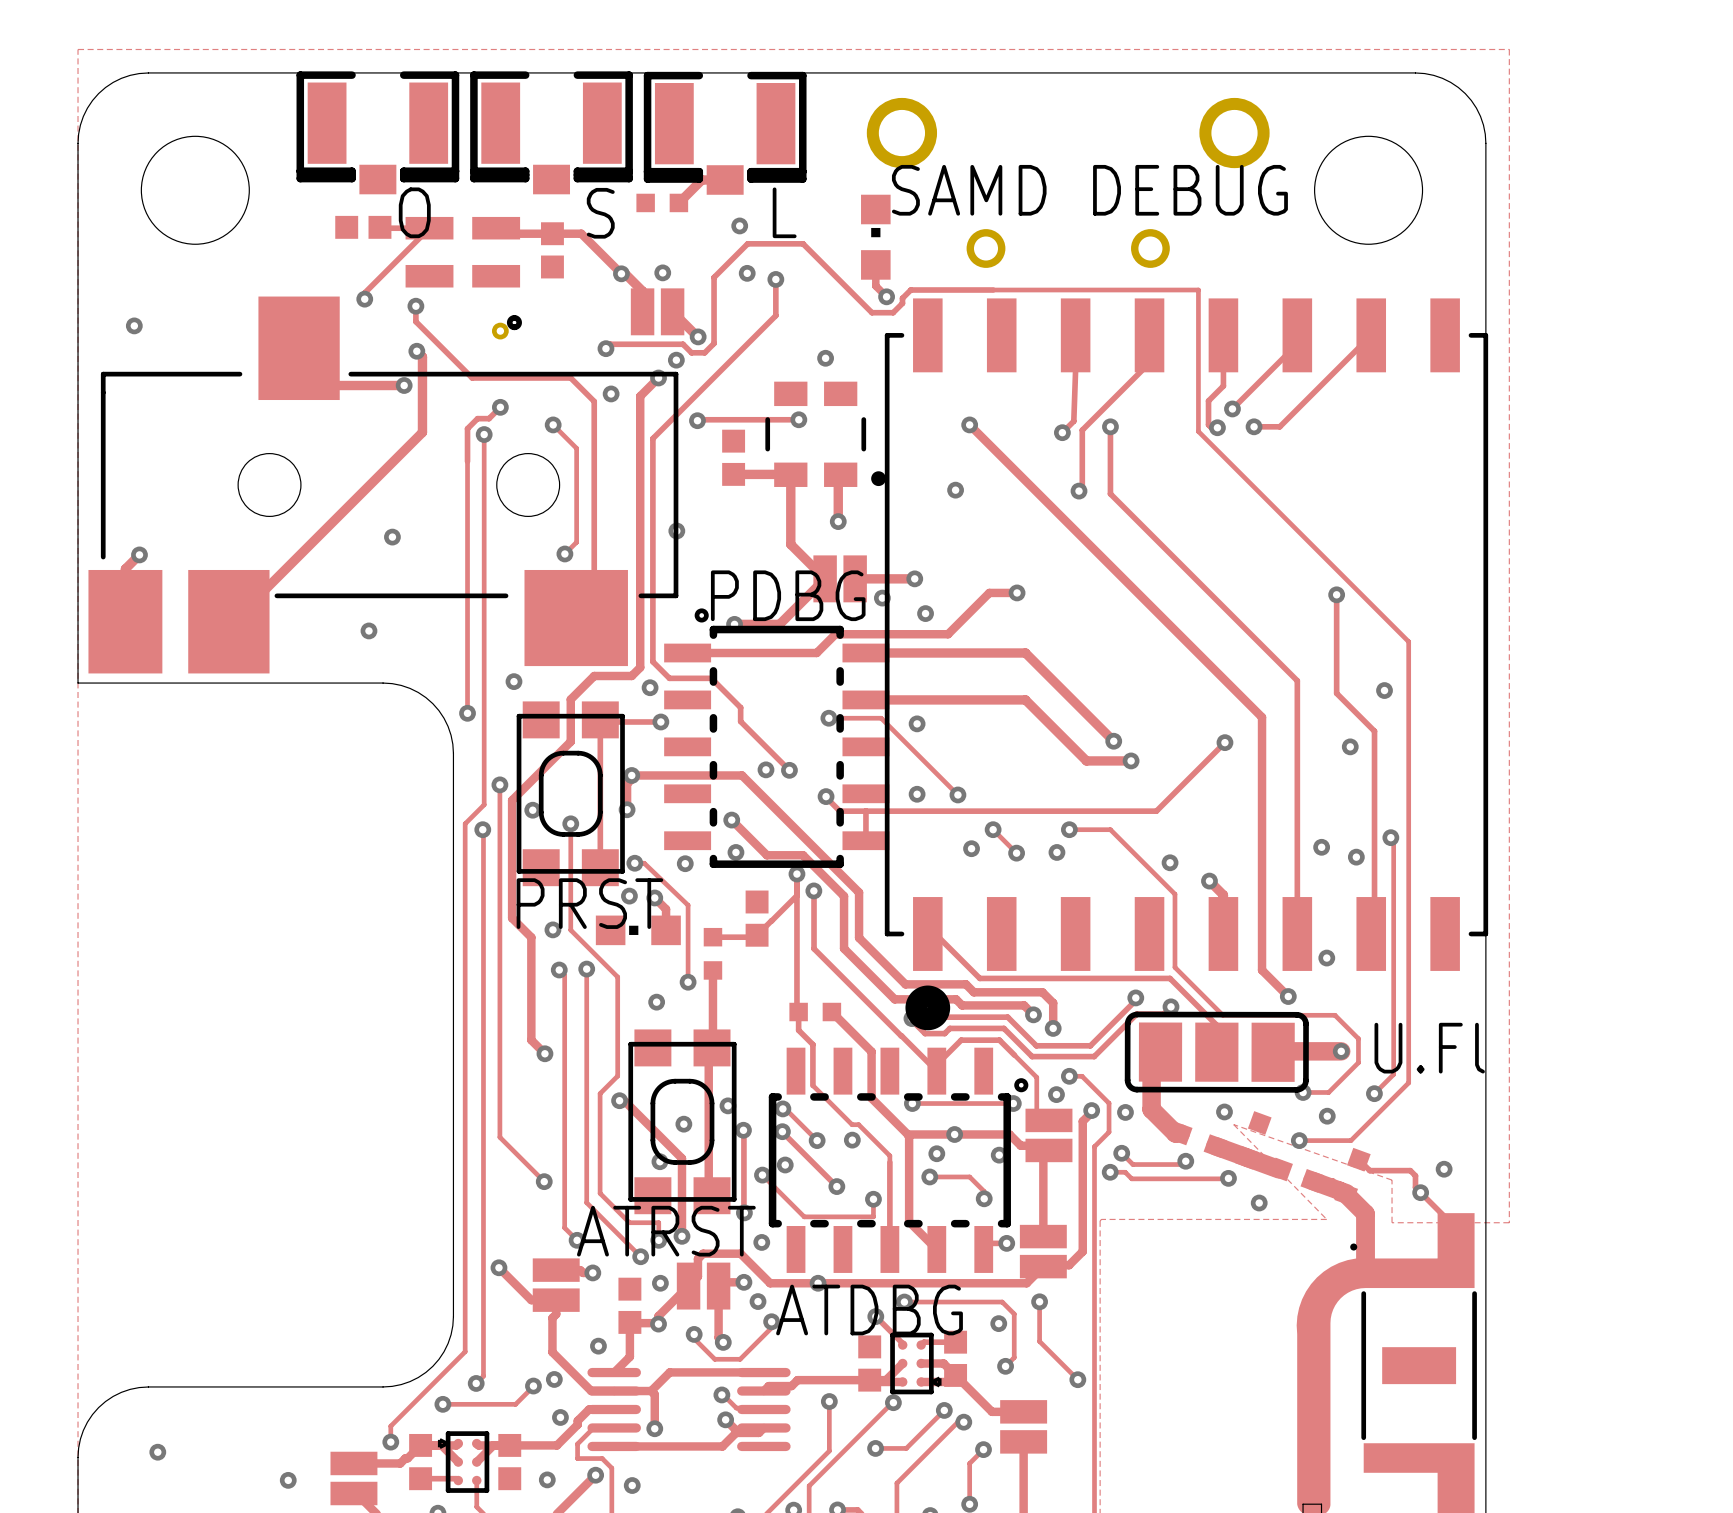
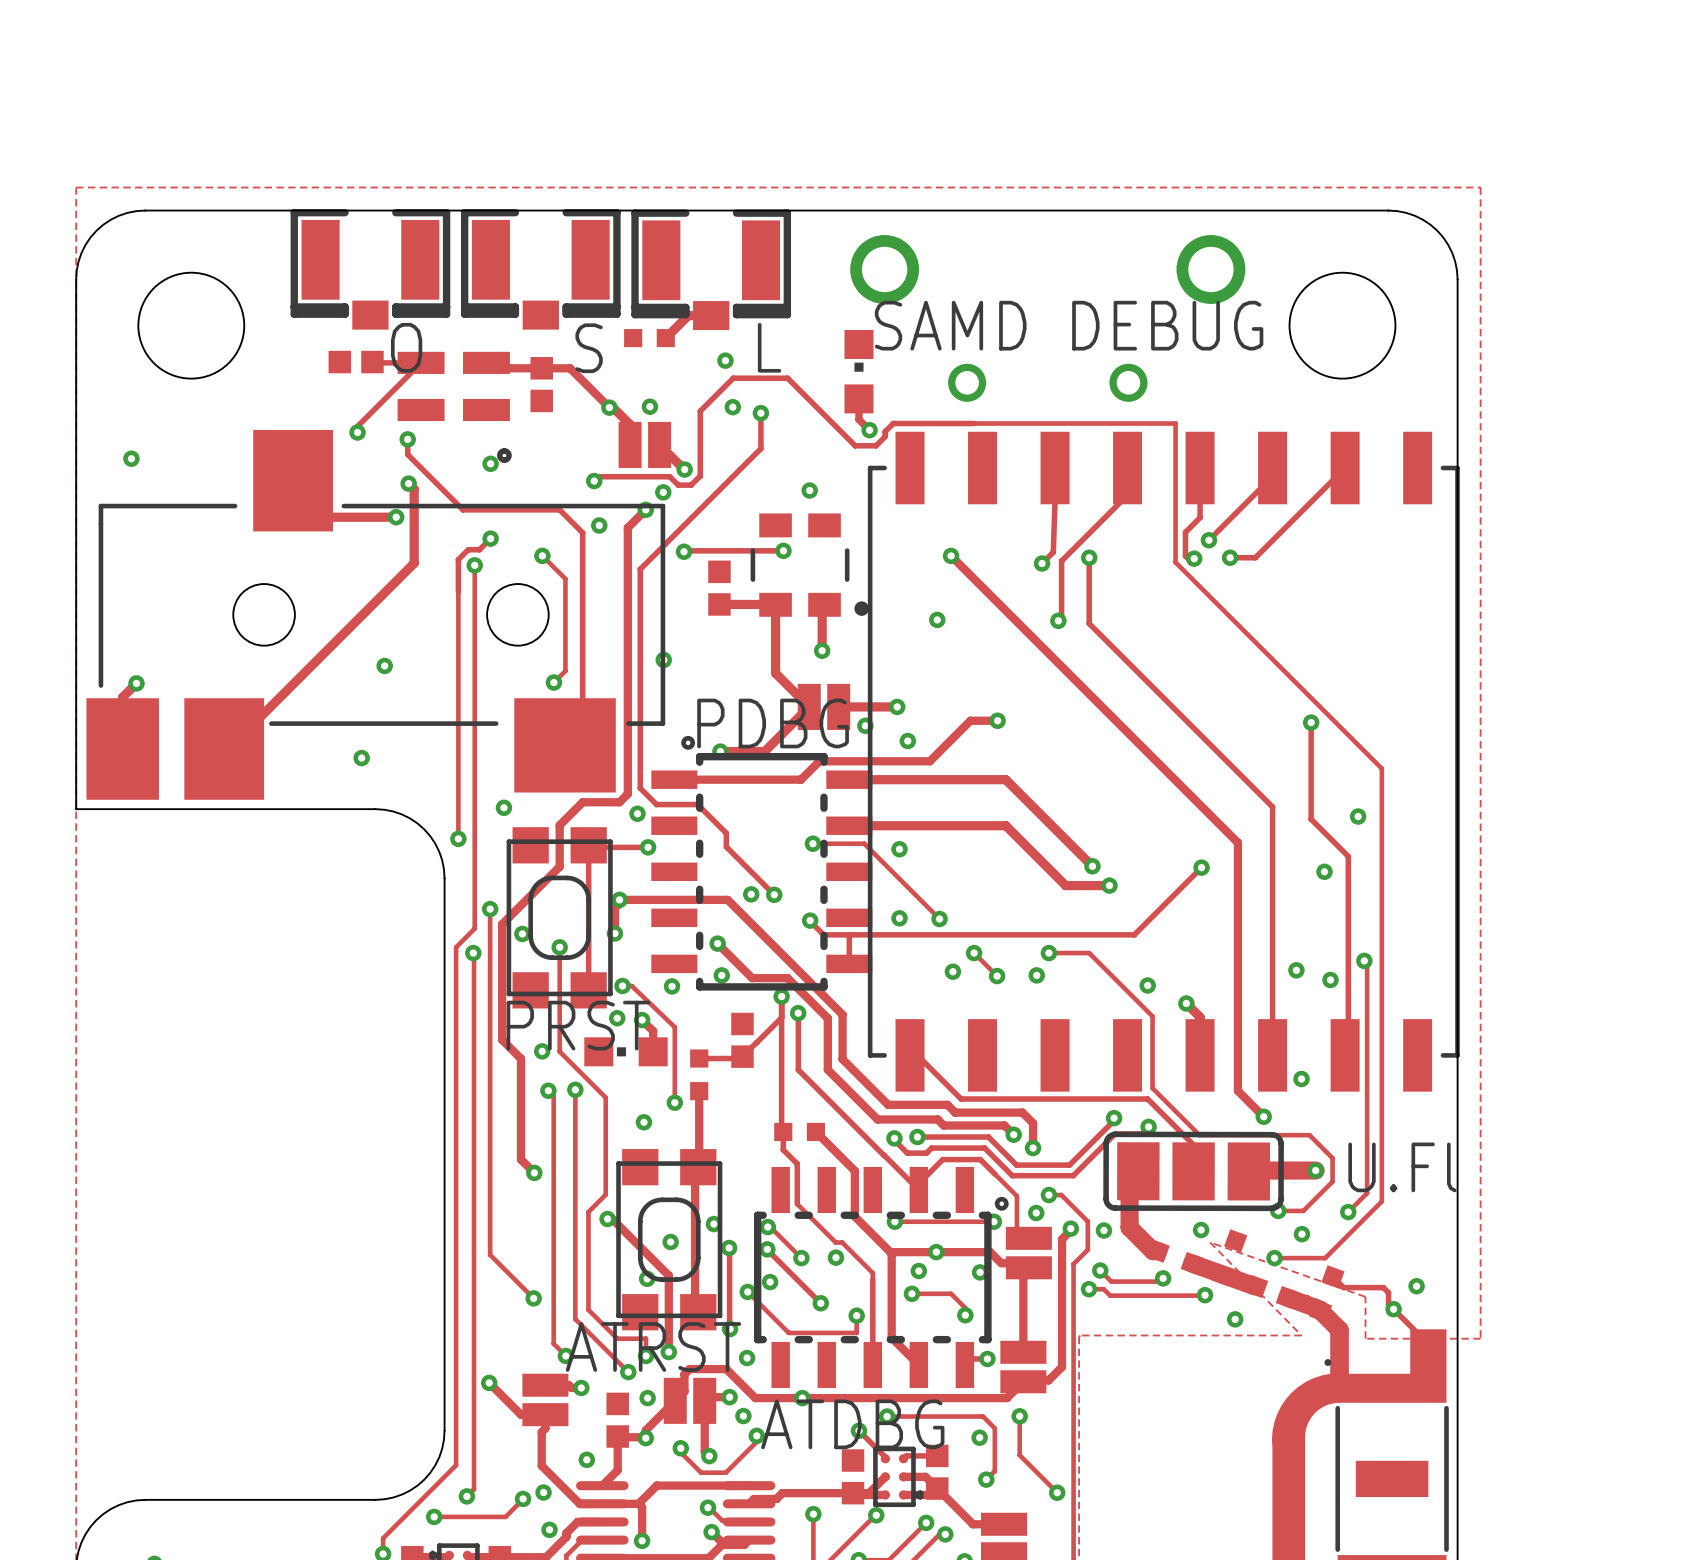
part footprint: [884, 298, 1489, 1031] -> [867, 431, 1460, 1092]

